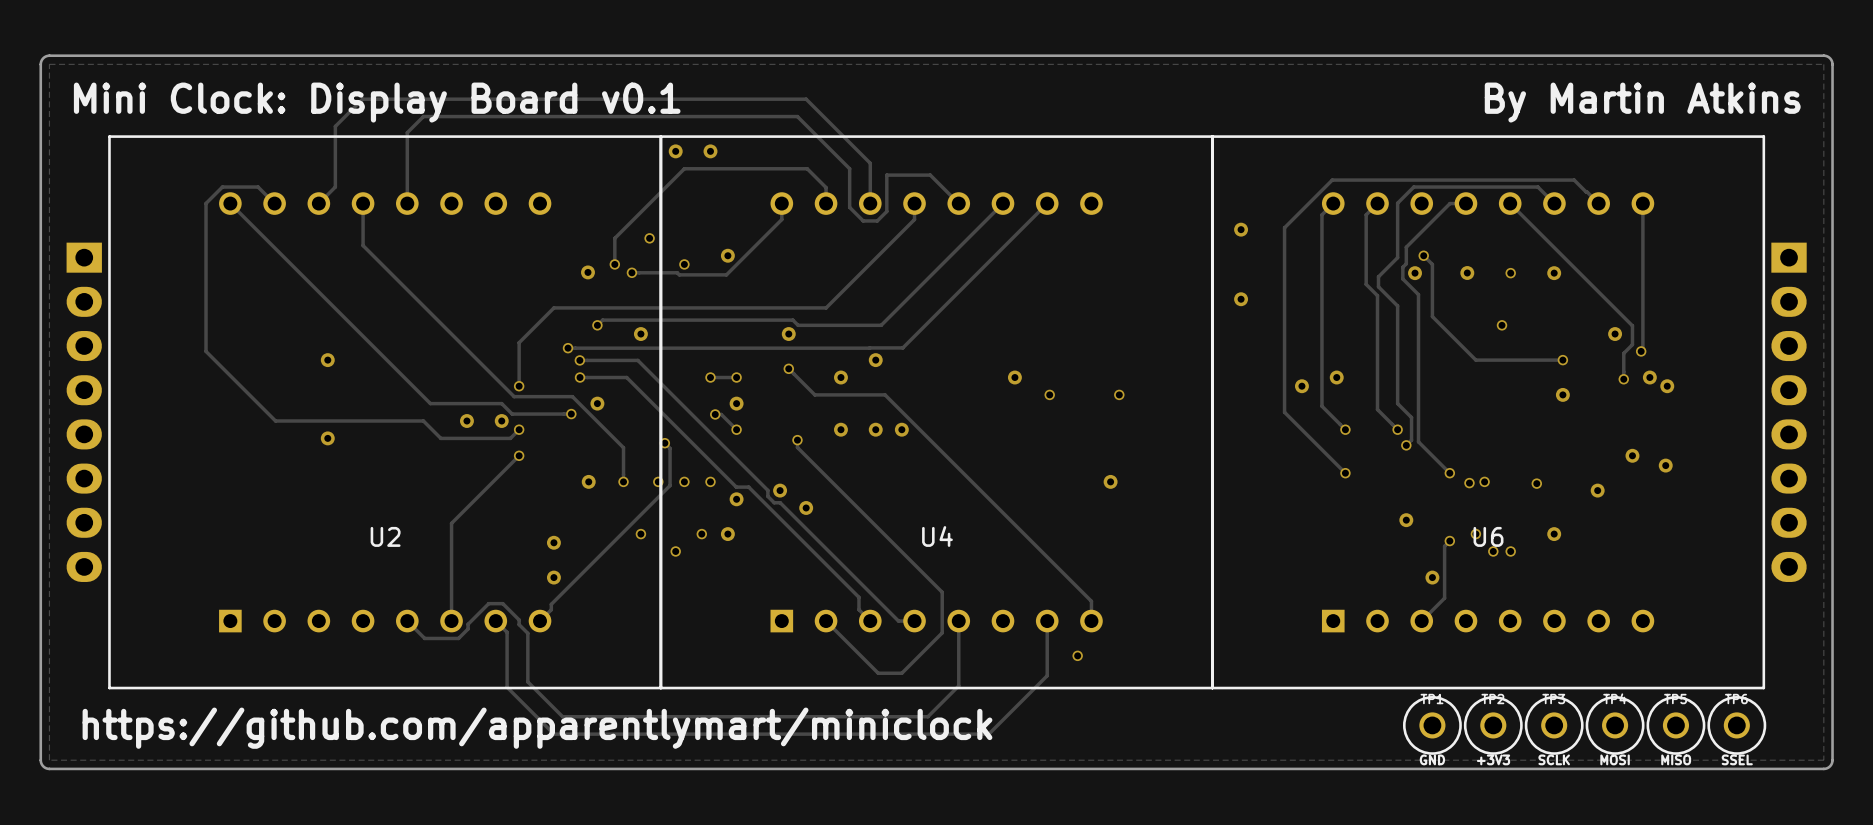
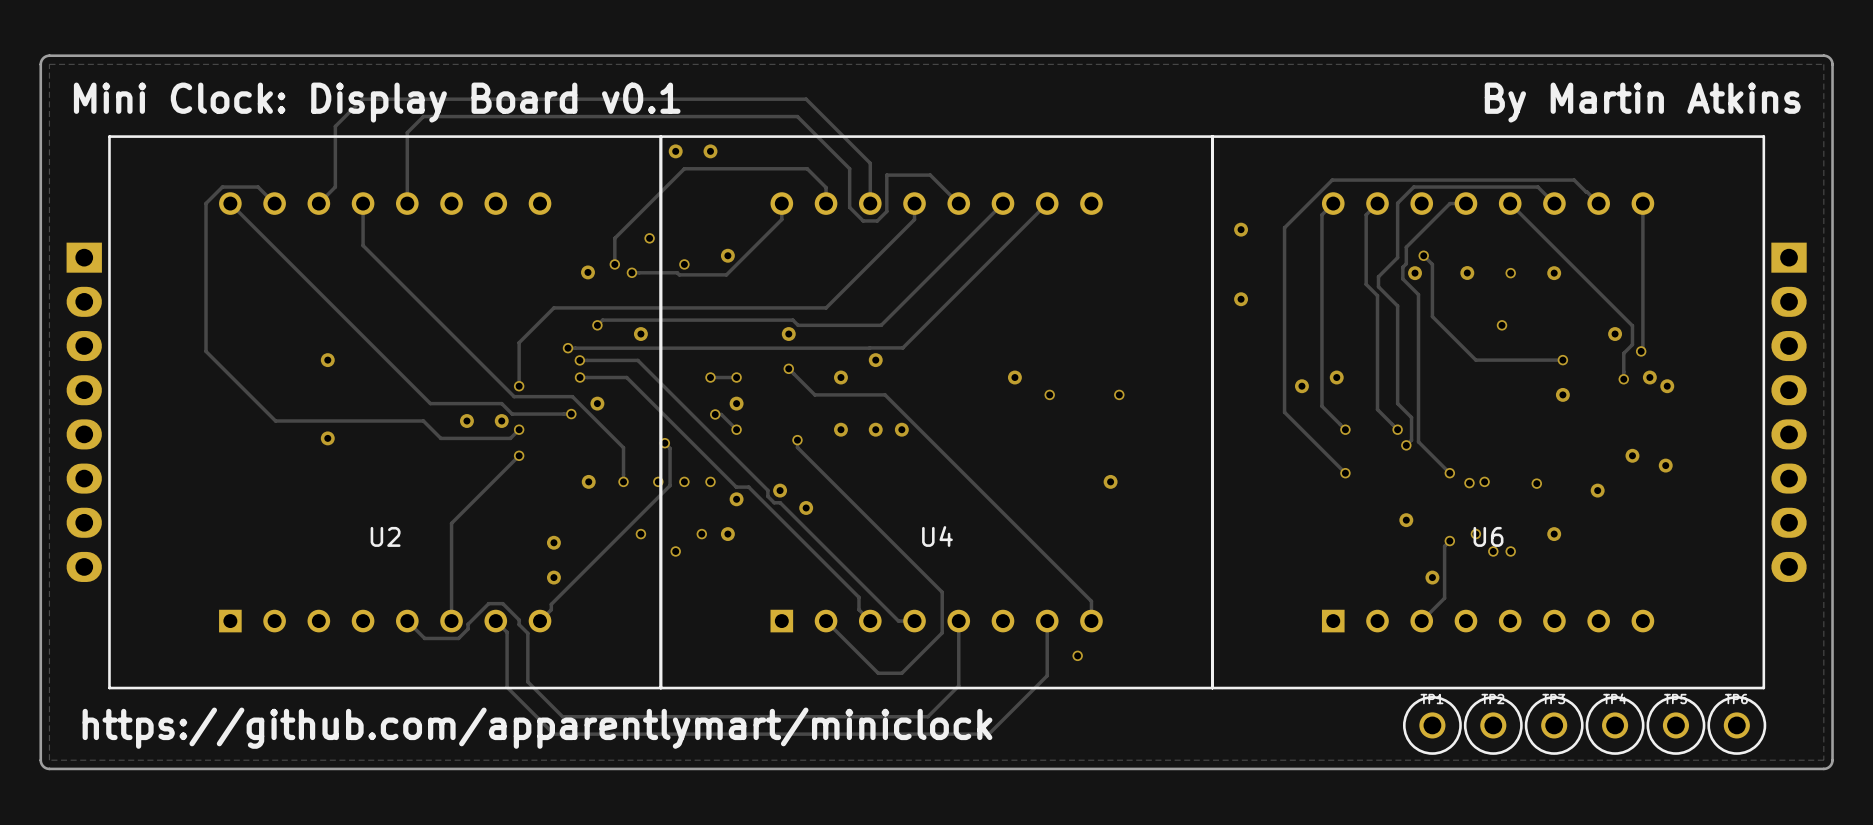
text: GND (1432, 759) -> none
text: +3V3 (1493, 759) -> none
text: SCLK (1554, 759) -> none
text: MOSI (1615, 759) -> none
text: MISO (1676, 759) -> none
text: SSEL (1737, 759) -> none

